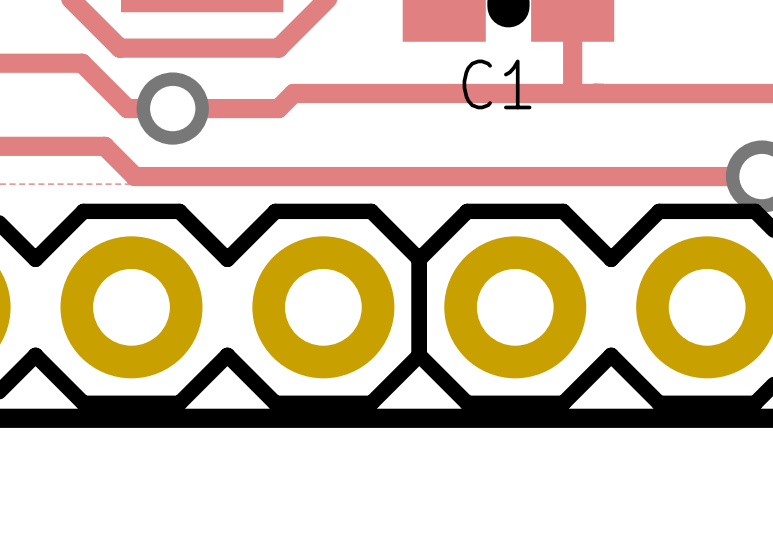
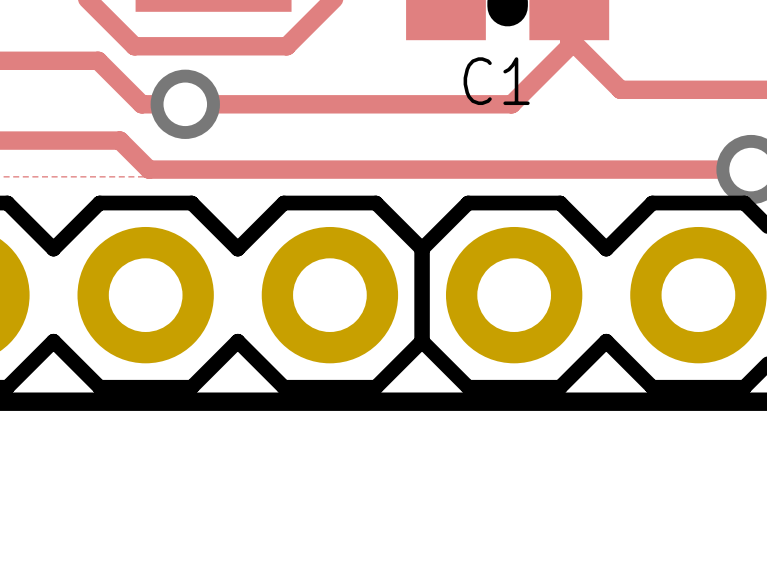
track: none -> (569, 38) (620, 89)
track: (572, 47) (572, 92) -> none
track: (626, 93) (293, 93) (278, 108) -> (569, 46) (511, 104) (286, 104)

